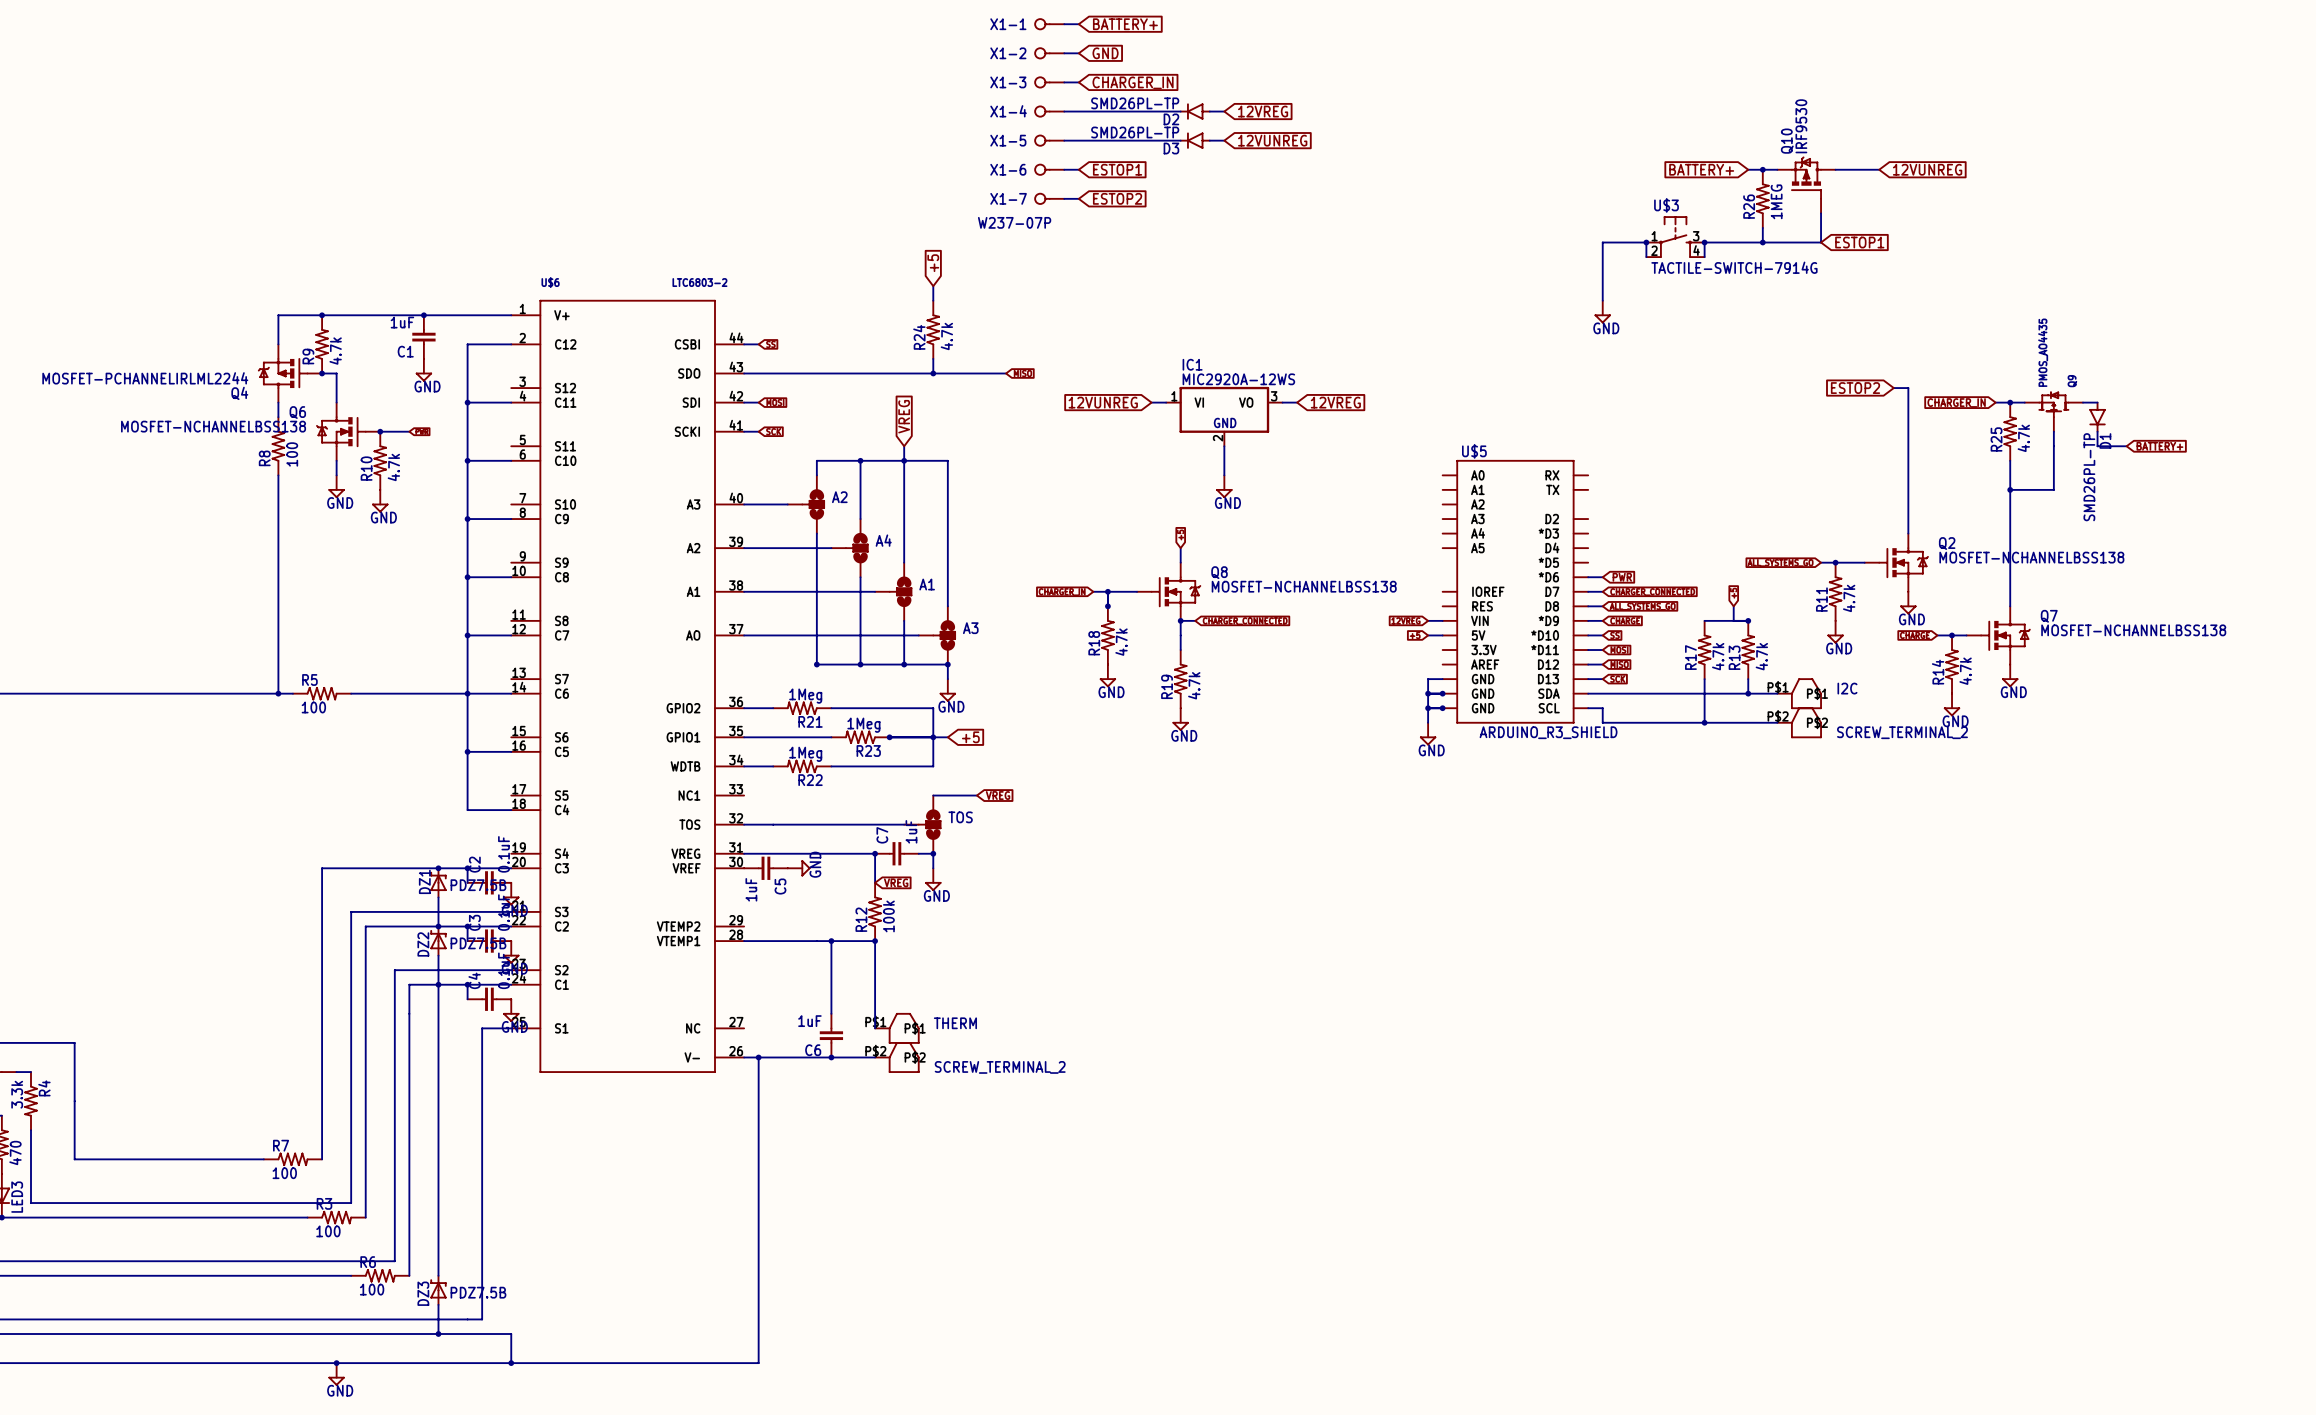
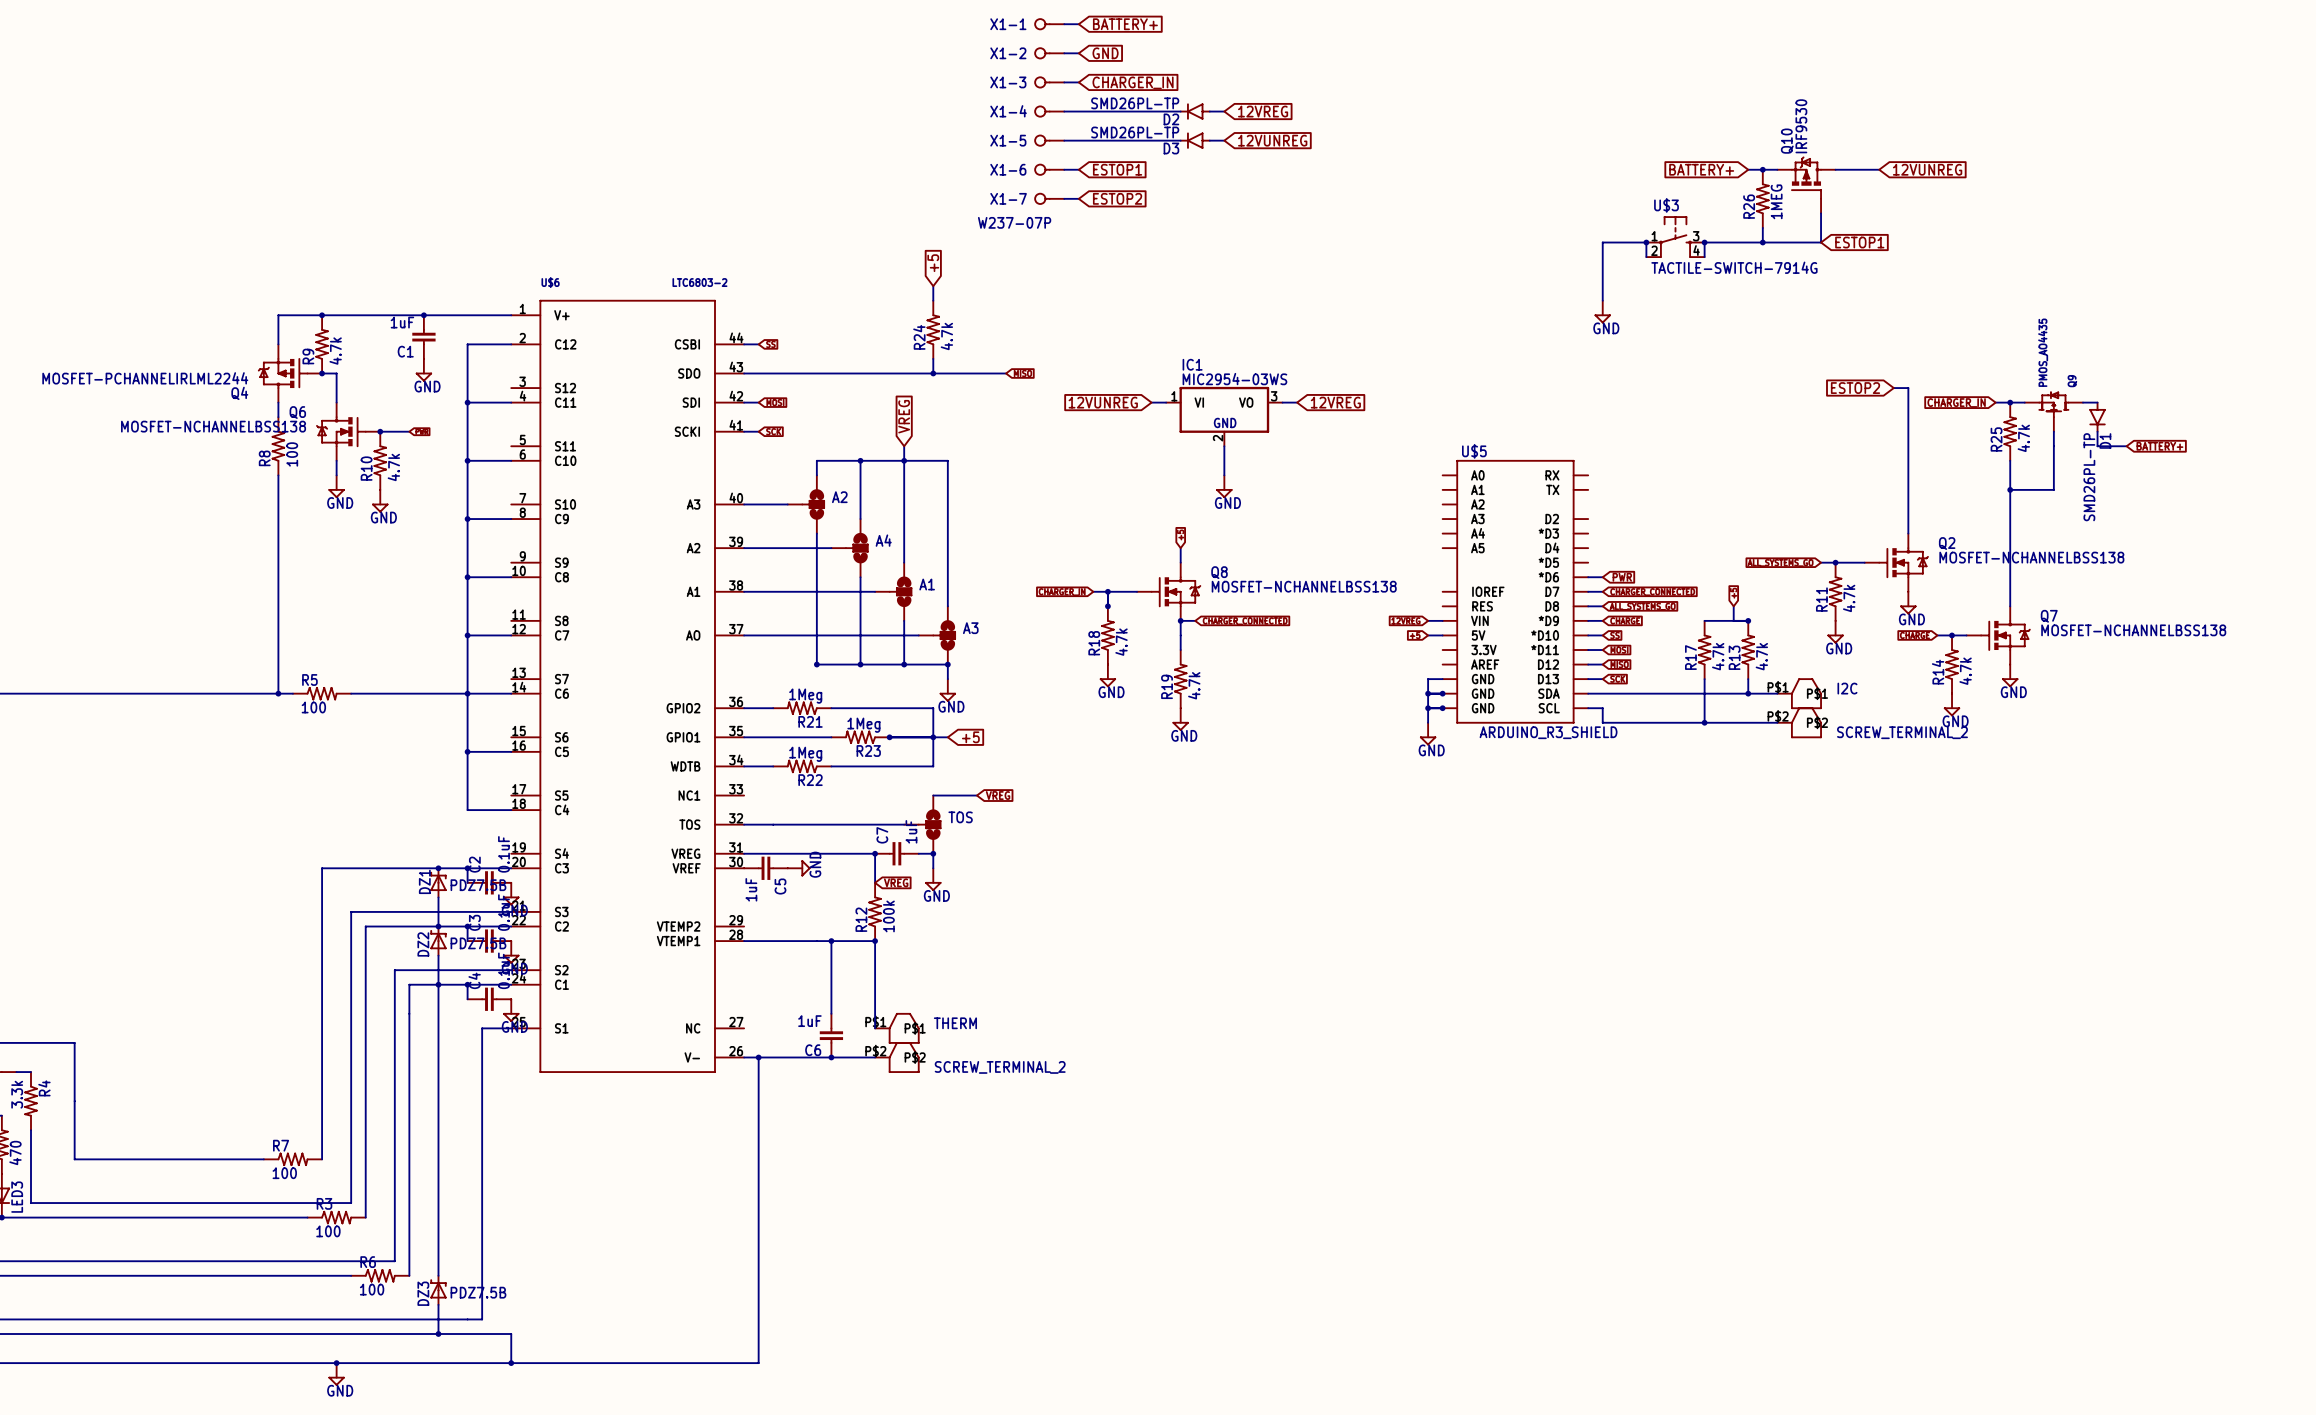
IC1 value: MIC2920A-12WS (1238, 379) -> MIC2954-03WS (1234, 379)

